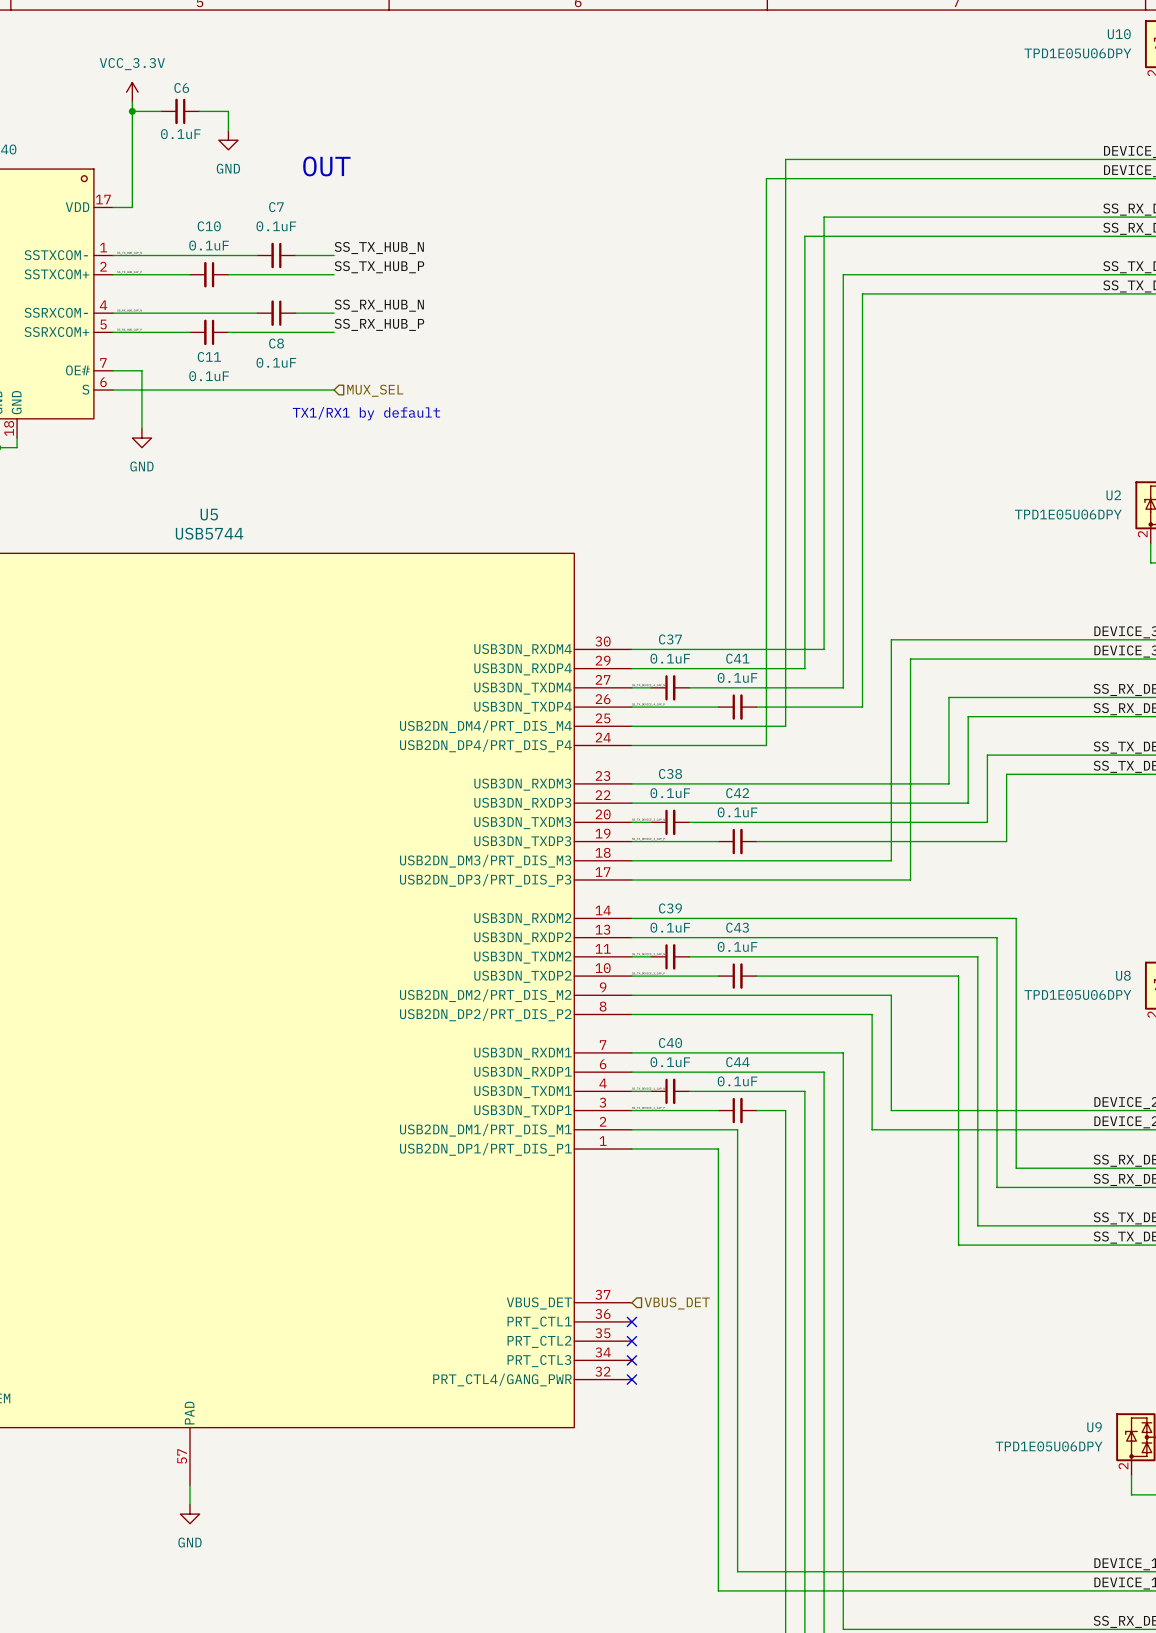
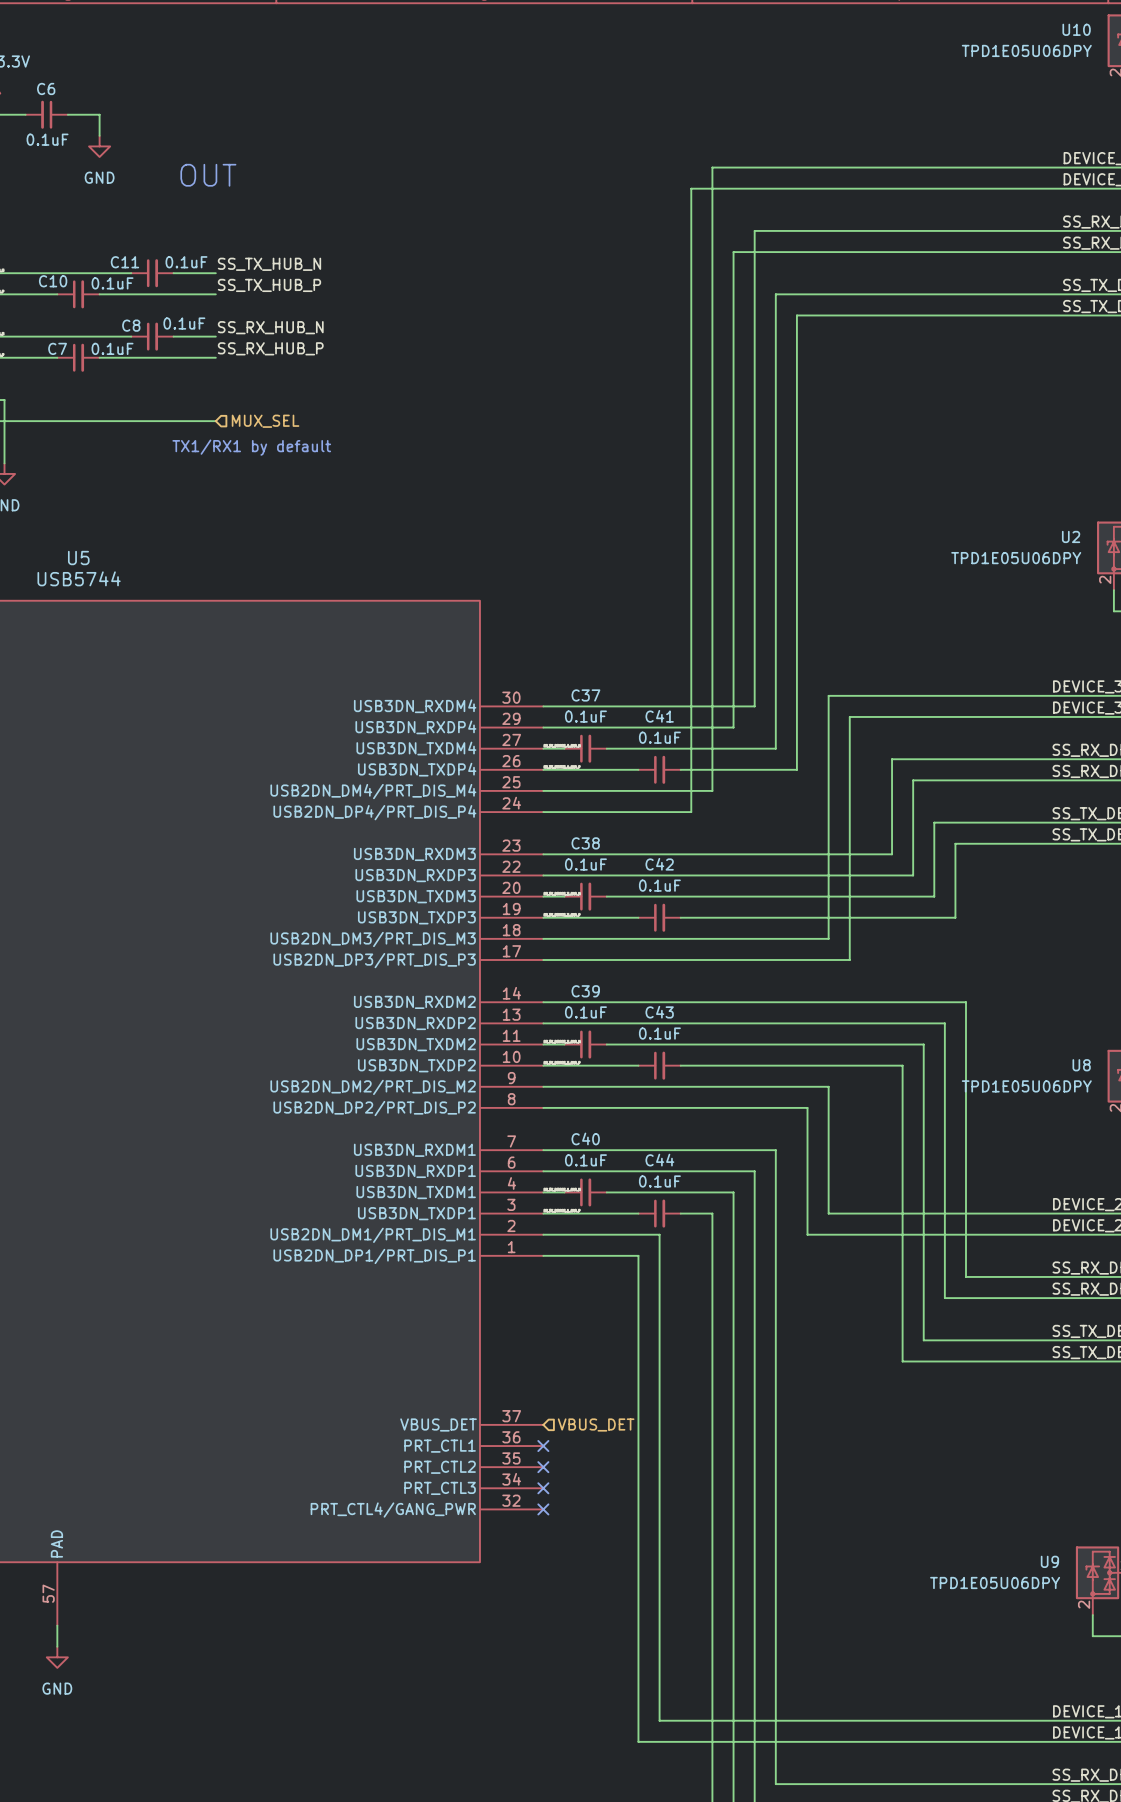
C7 name position: C7 (276, 207) -> C7 (57, 348)
C10 name position: C10 (209, 226) -> C10 (53, 281)
C7 value position: 0.1uF (276, 226) -> 0.1uF (112, 348)
C10 value position: 0.1uF (209, 245) -> 0.1uF (112, 283)
C7 rotation: 0° (276, 255) -> 180° (78, 357)
C7 position: (276, 255) -> (78, 357)
C10 rotation: 0° (209, 274) -> 180° (78, 294)
C8 rotation: 0° (276, 313) -> 180° (152, 336)
C11 rotation: 0° (209, 332) -> 180° (152, 273)
C11 position: (209, 332) -> (152, 273)
C8 name position: C8 (276, 343) -> C8 (131, 325)
C11 name position: C11 (209, 356) -> C11 (124, 262)
C8 value position: 0.1uF (276, 362) -> 0.1uF (184, 323)
C11 value position: 0.1uF (209, 376) -> 0.1uF (186, 262)

